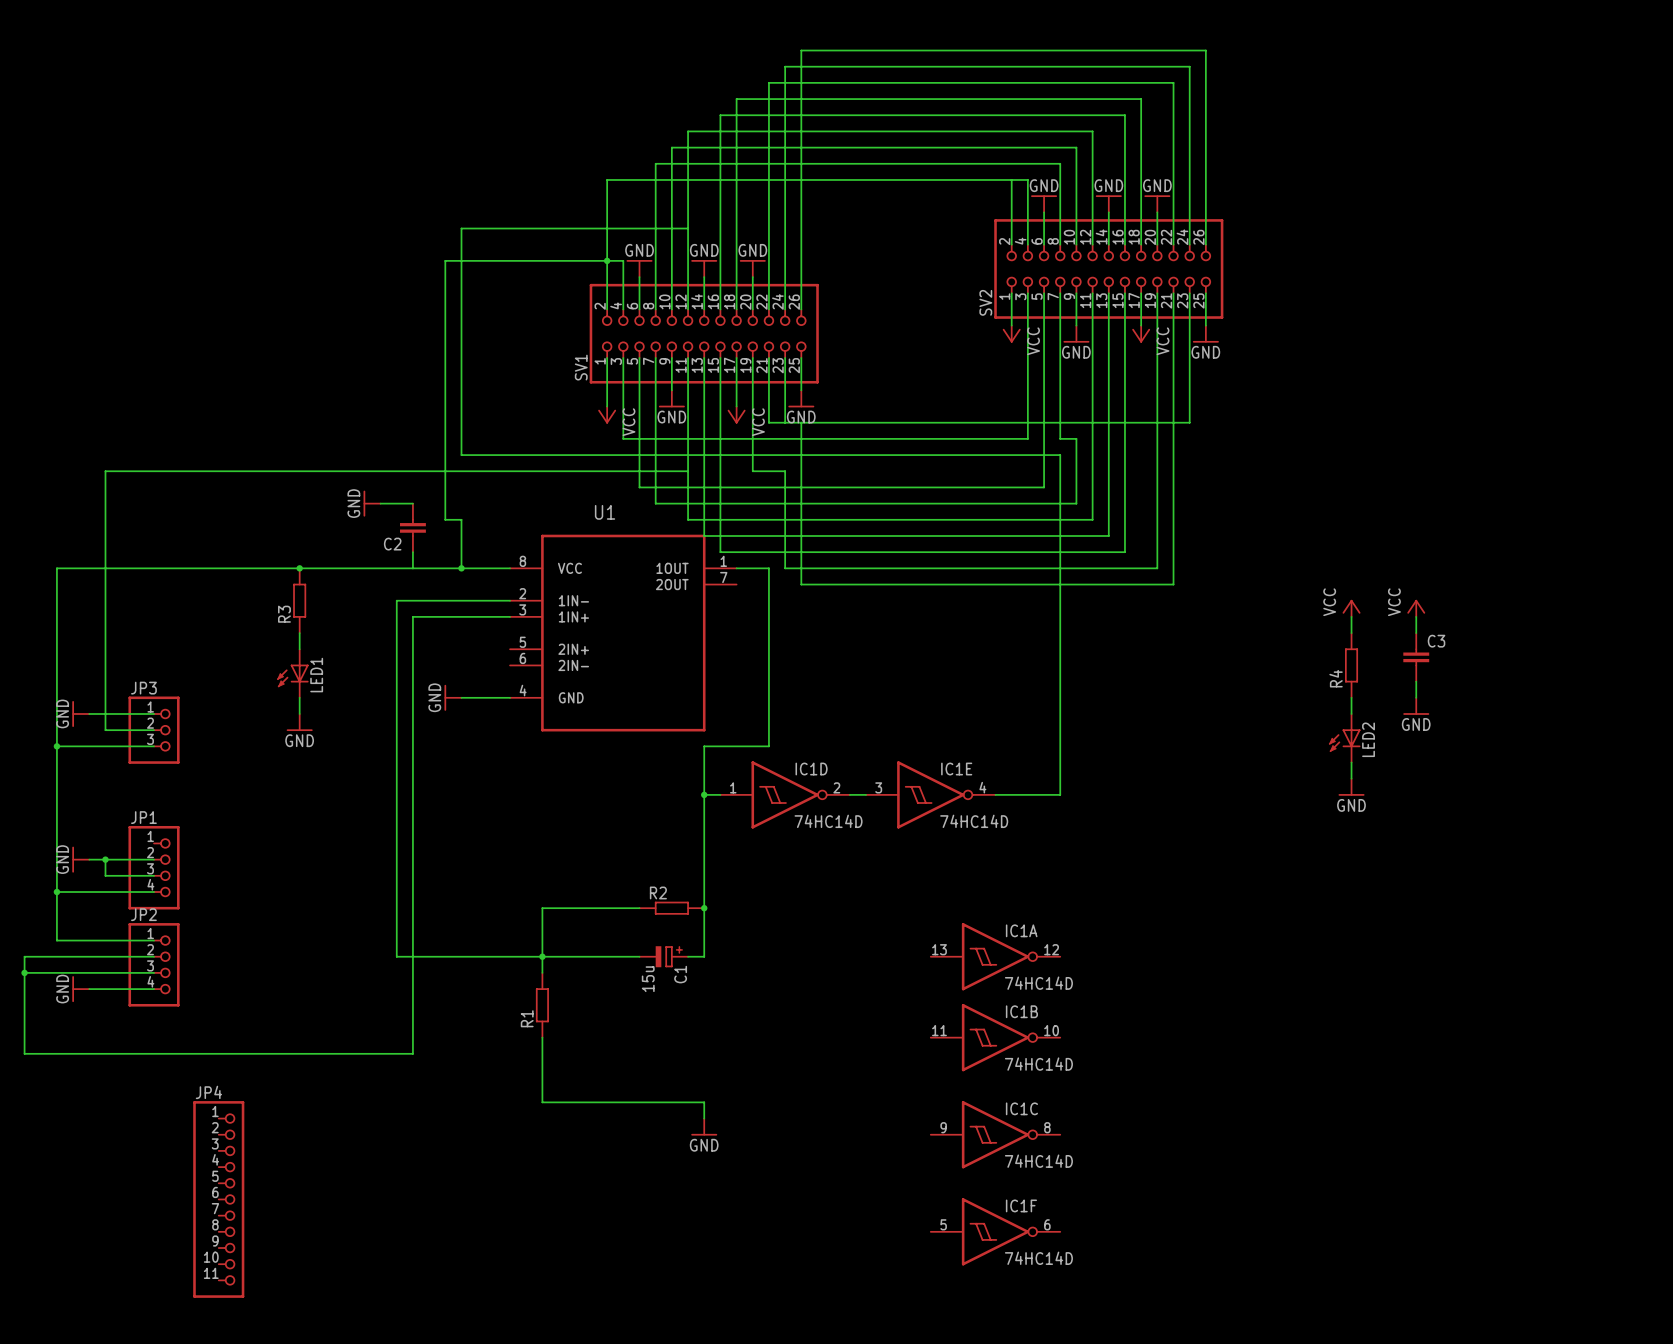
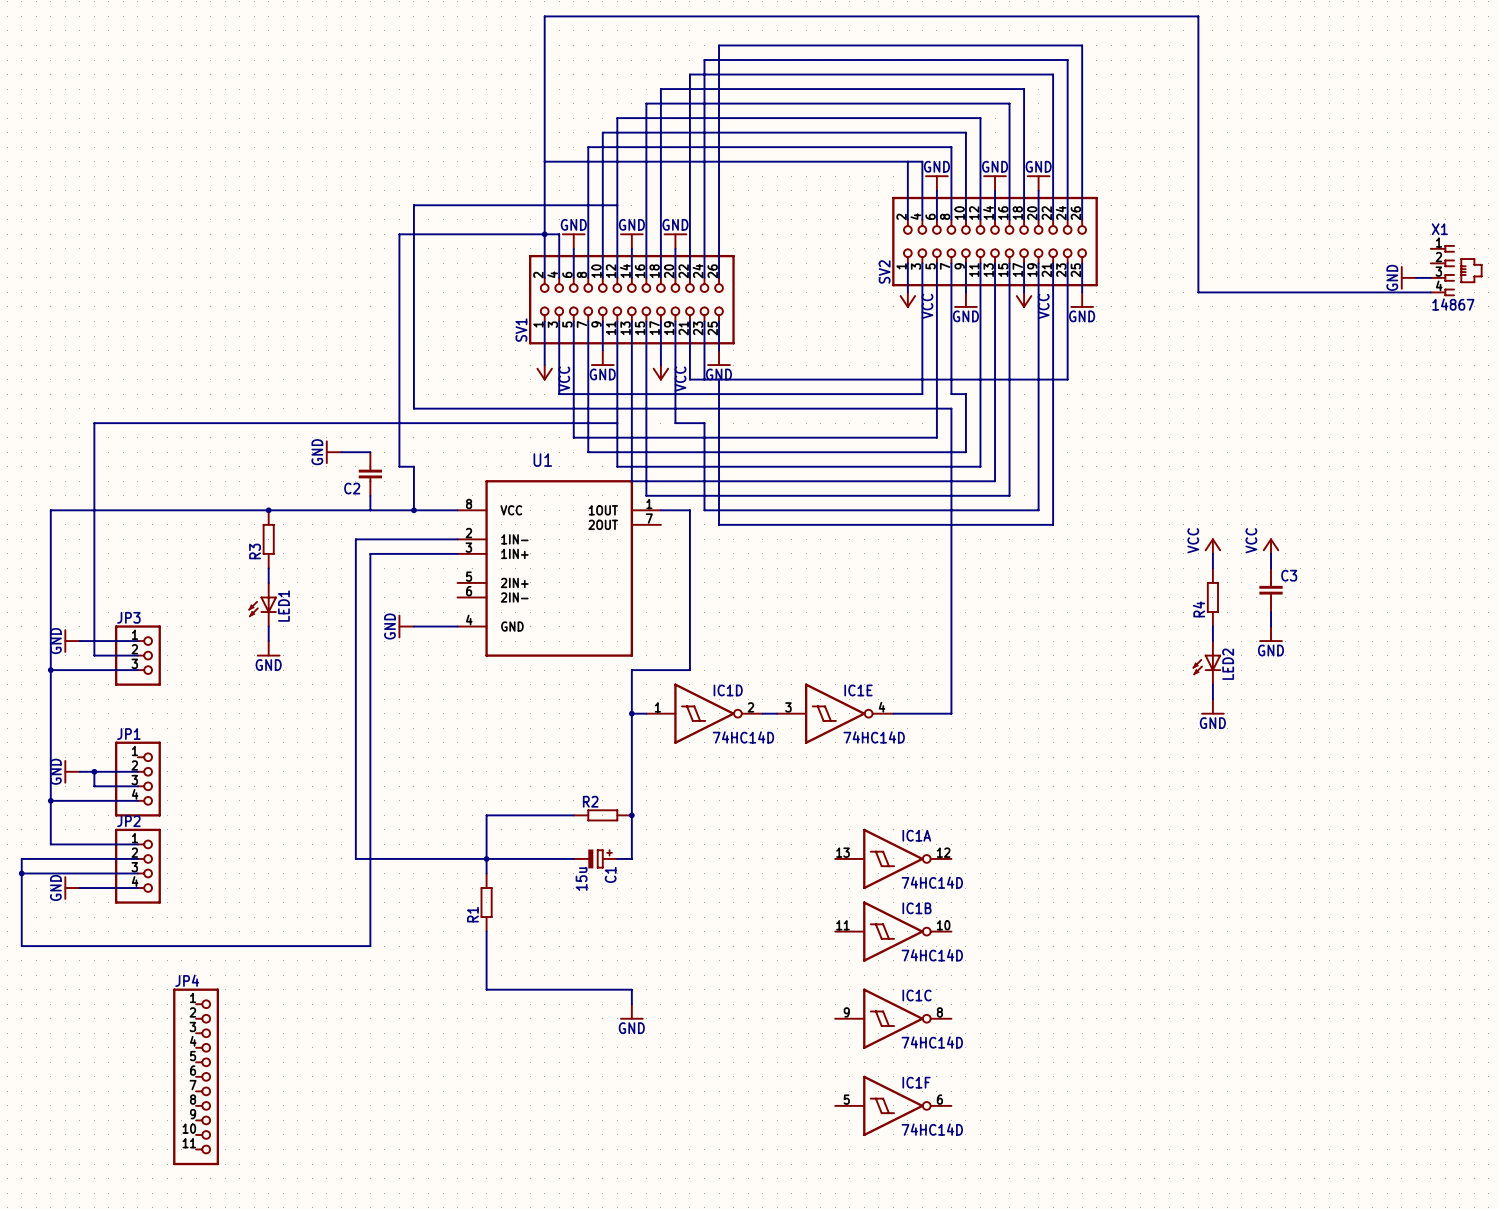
wire: none -> (544, 161) (544, 16) (1198, 16) (1198, 292) (1430, 292)
X1: none -> 14867 (1456, 270)
power symbol: none -> GND (1408, 277)
wire: none -> (1416, 277) (1430, 277)

